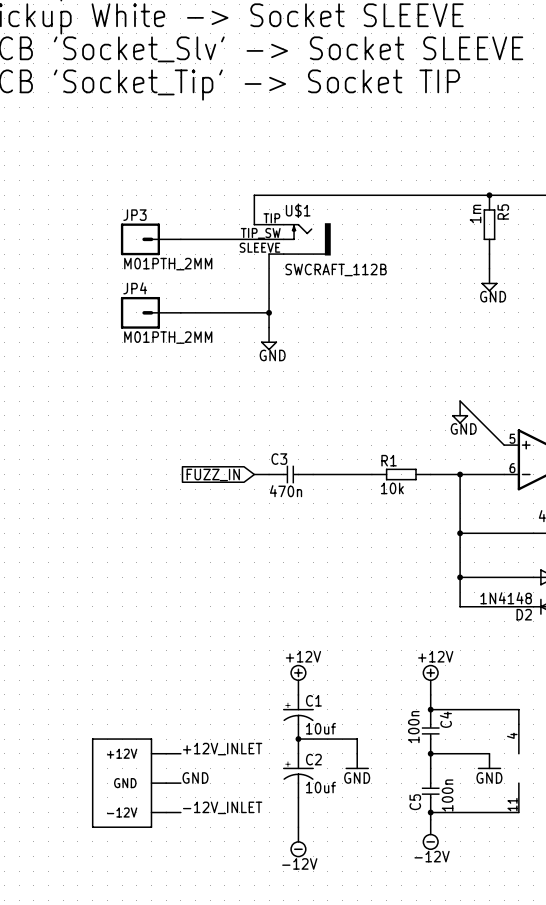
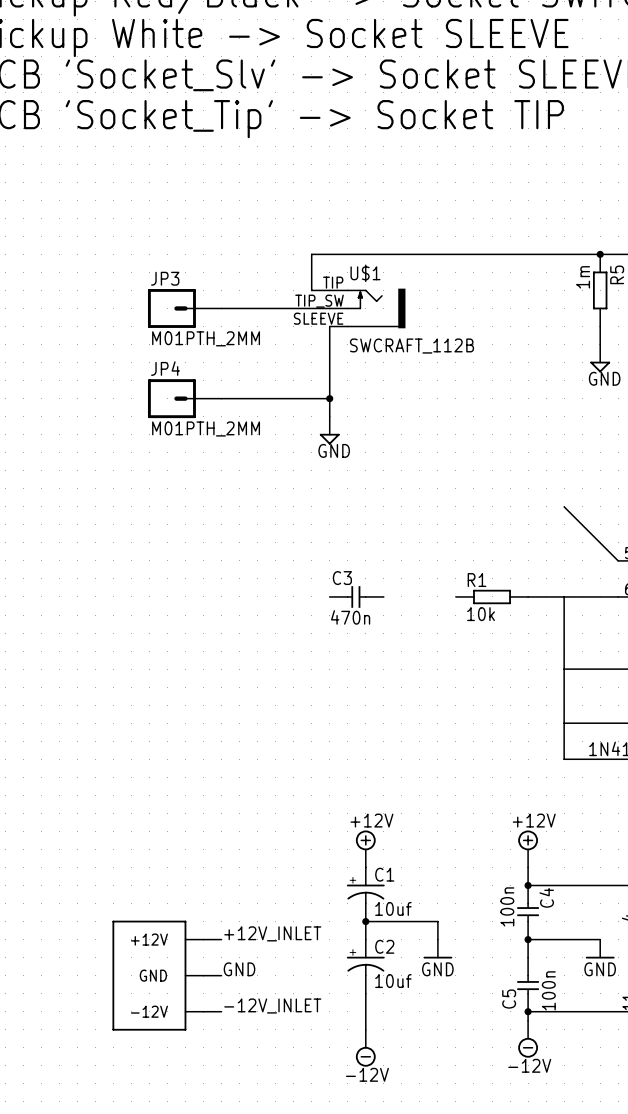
power symbol: GND (460, 412) -> none
global label: FUZZ_IN (213, 474) -> none
wire: (254, 474) (269, 474) -> none
wire: (313, 474) (371, 474) -> none
junction: (460, 474) -> none
junction: (460, 533) -> none
junction: (460, 577) -> none

